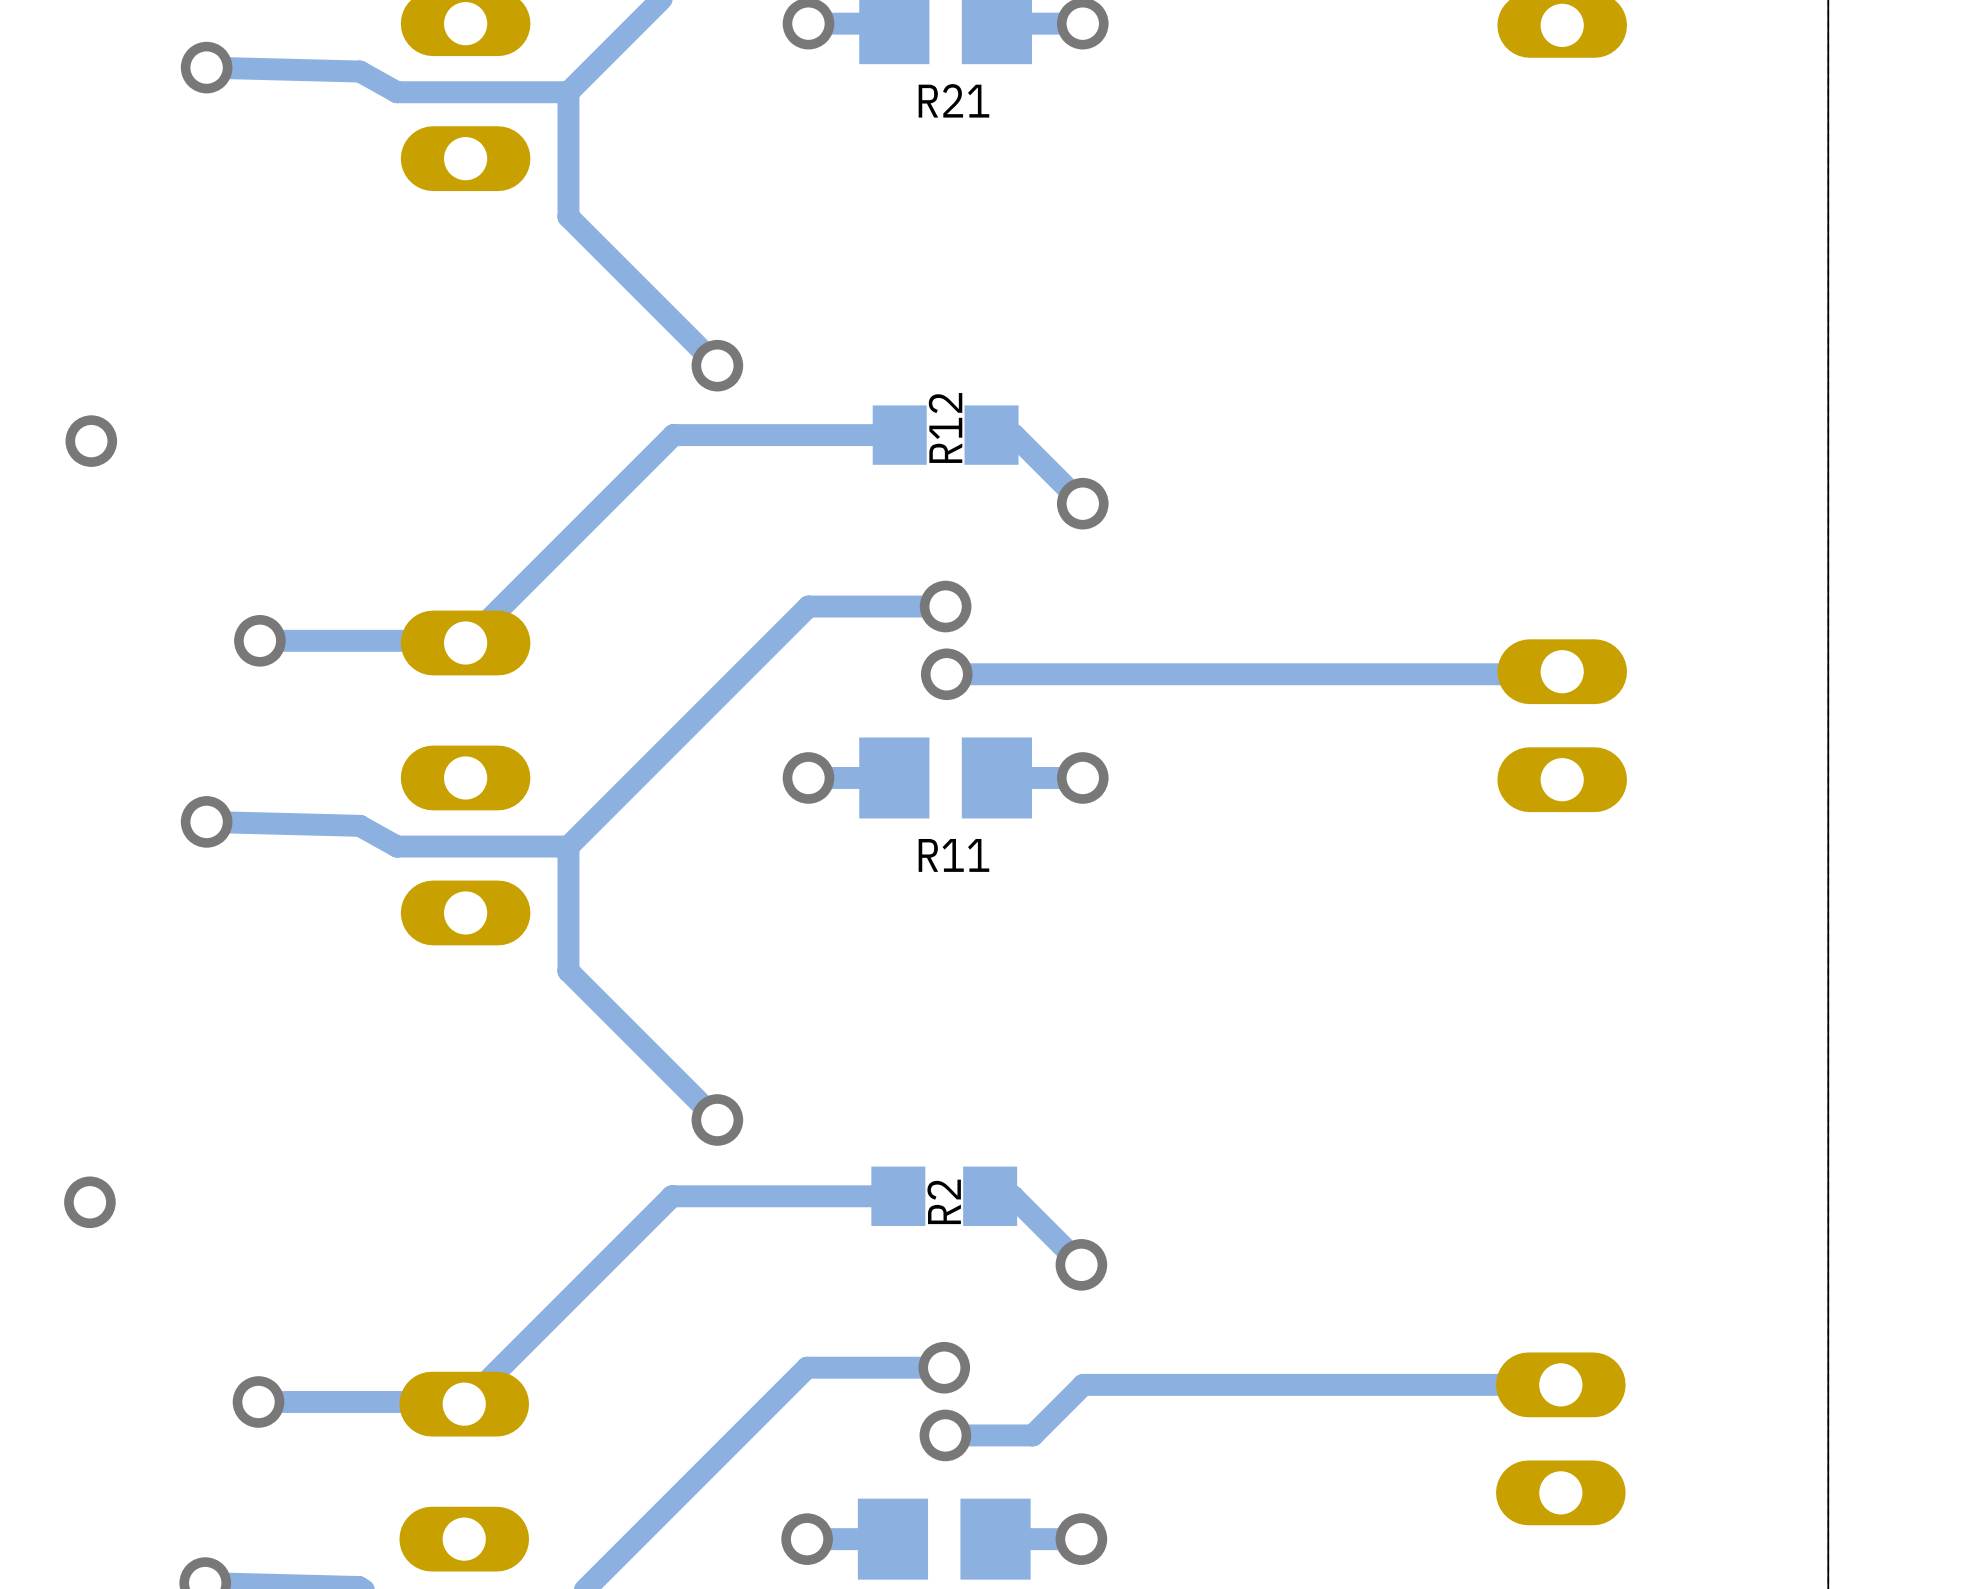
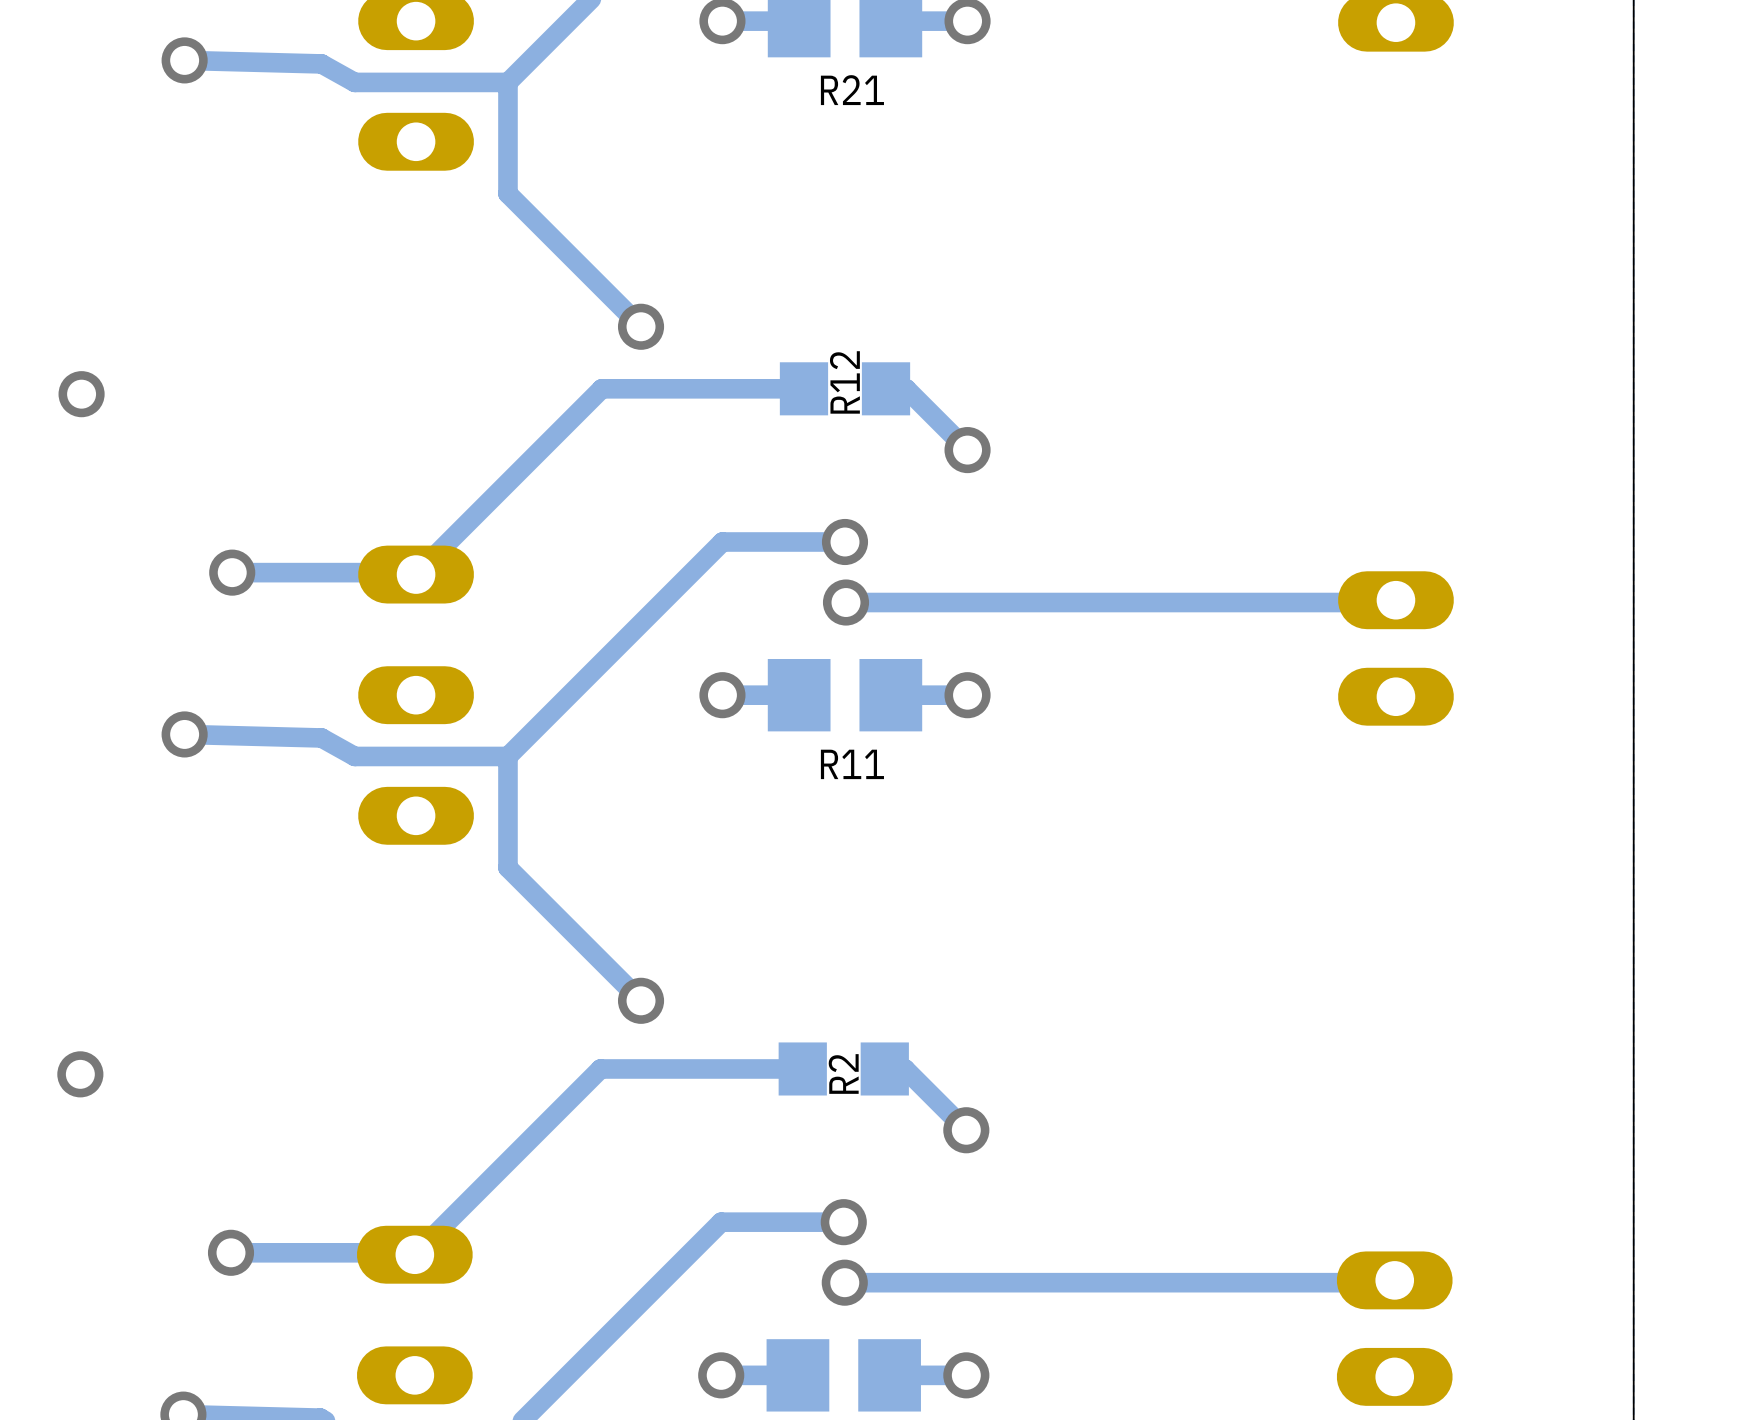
track: (1560, 1384) (1083, 1384) (1032, 1435) -> (1394, 1280) (1394, 1282) (922, 1282)
part position: (1560, 1438) -> (1394, 1328)

